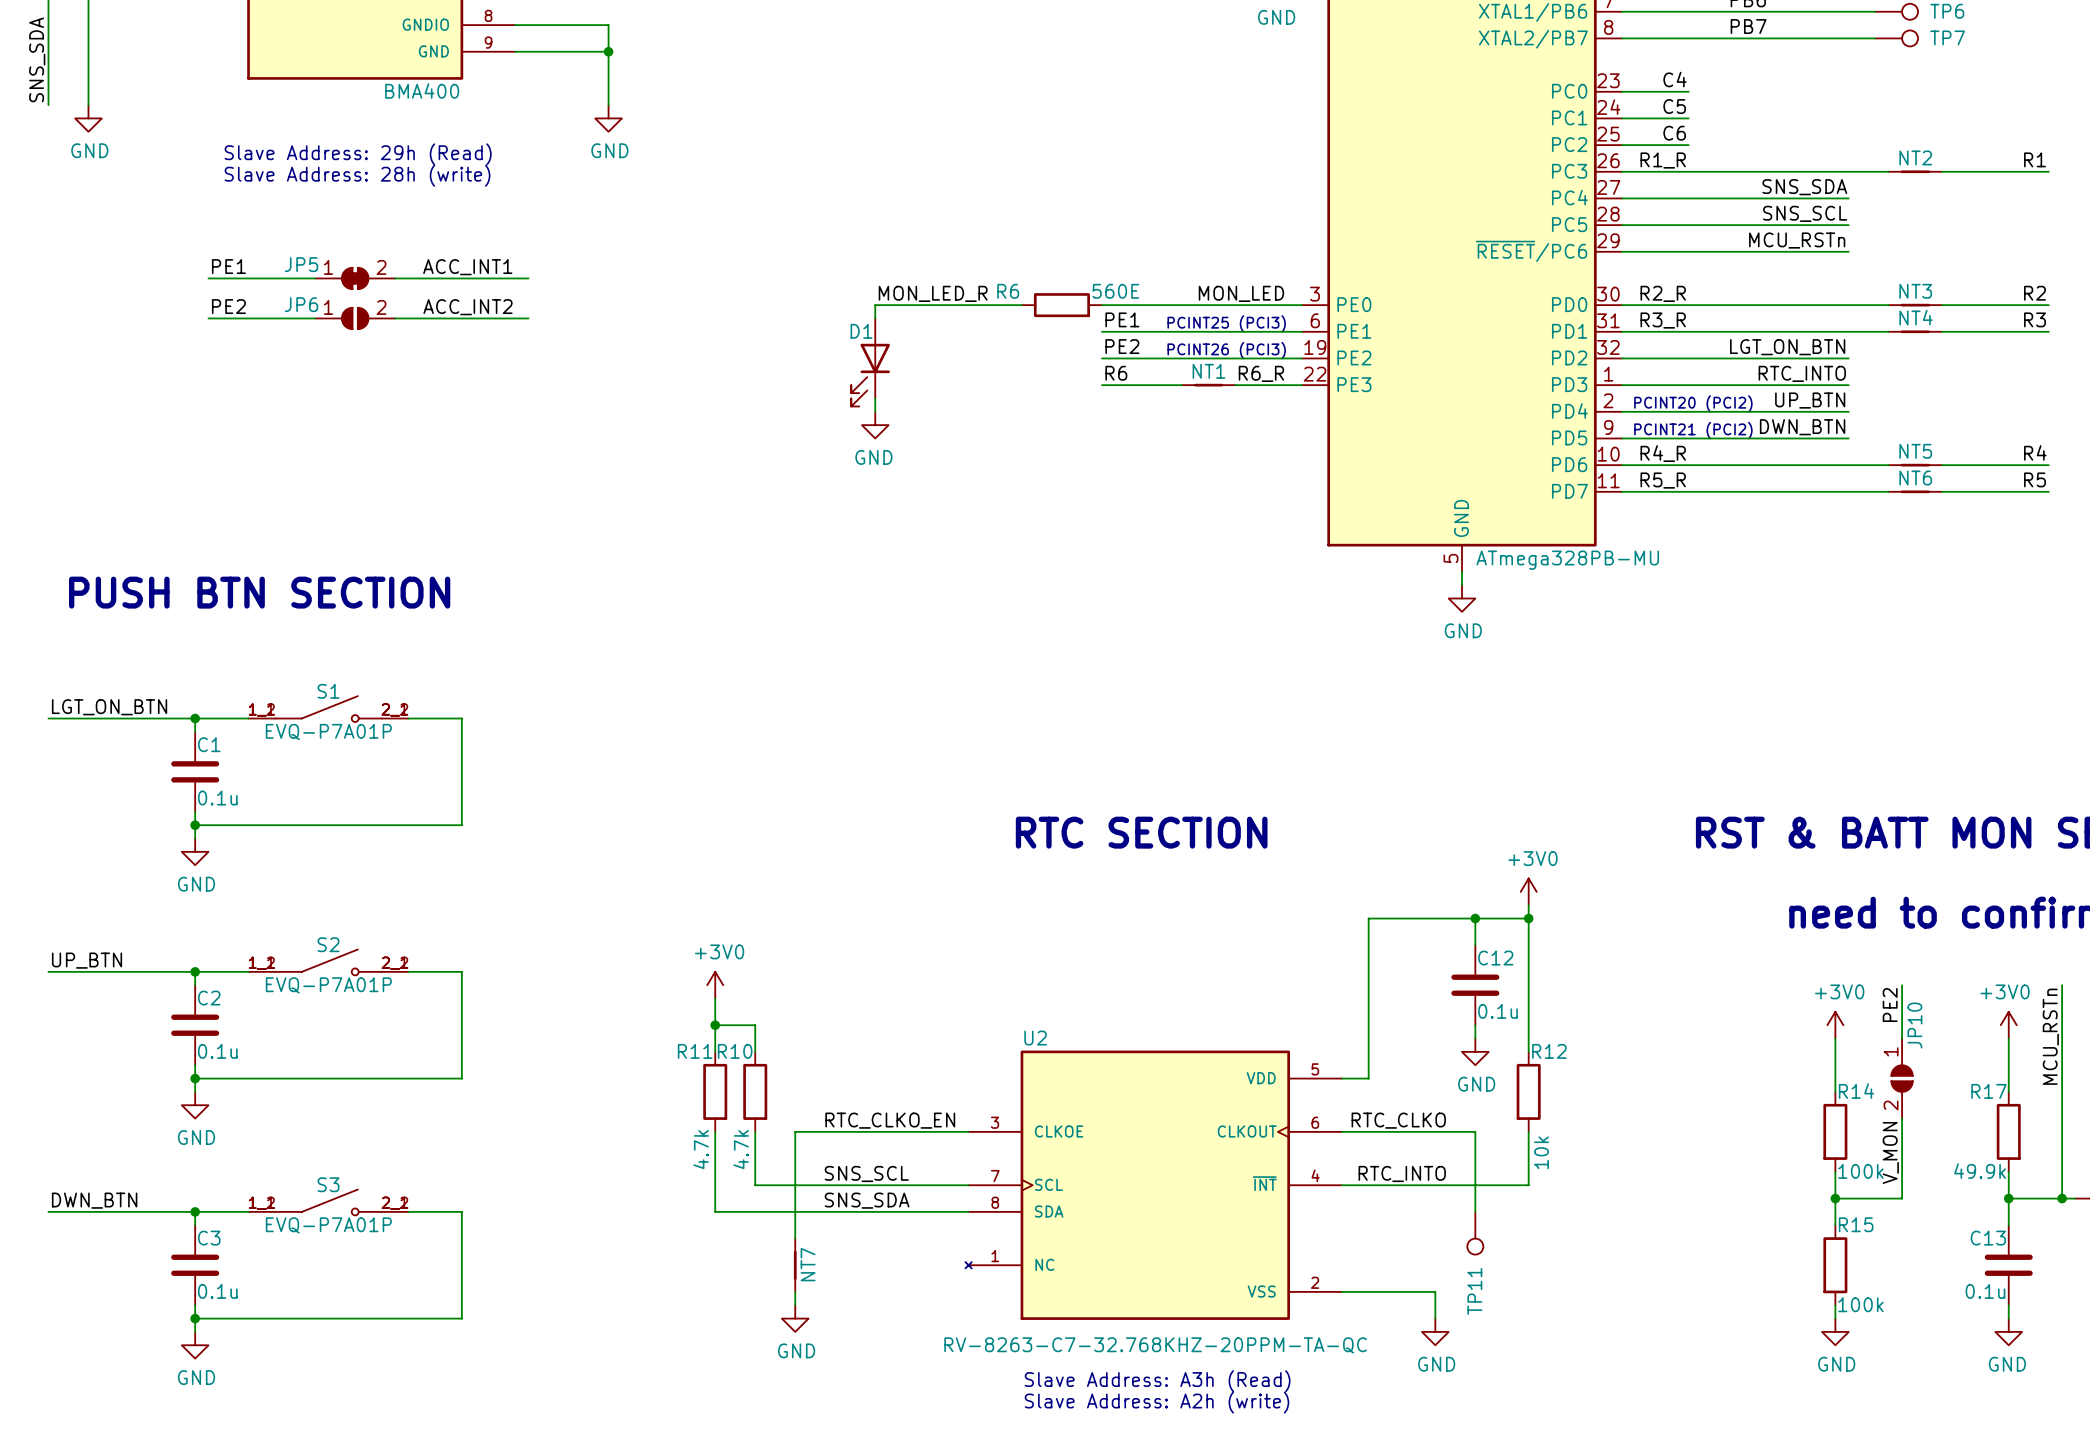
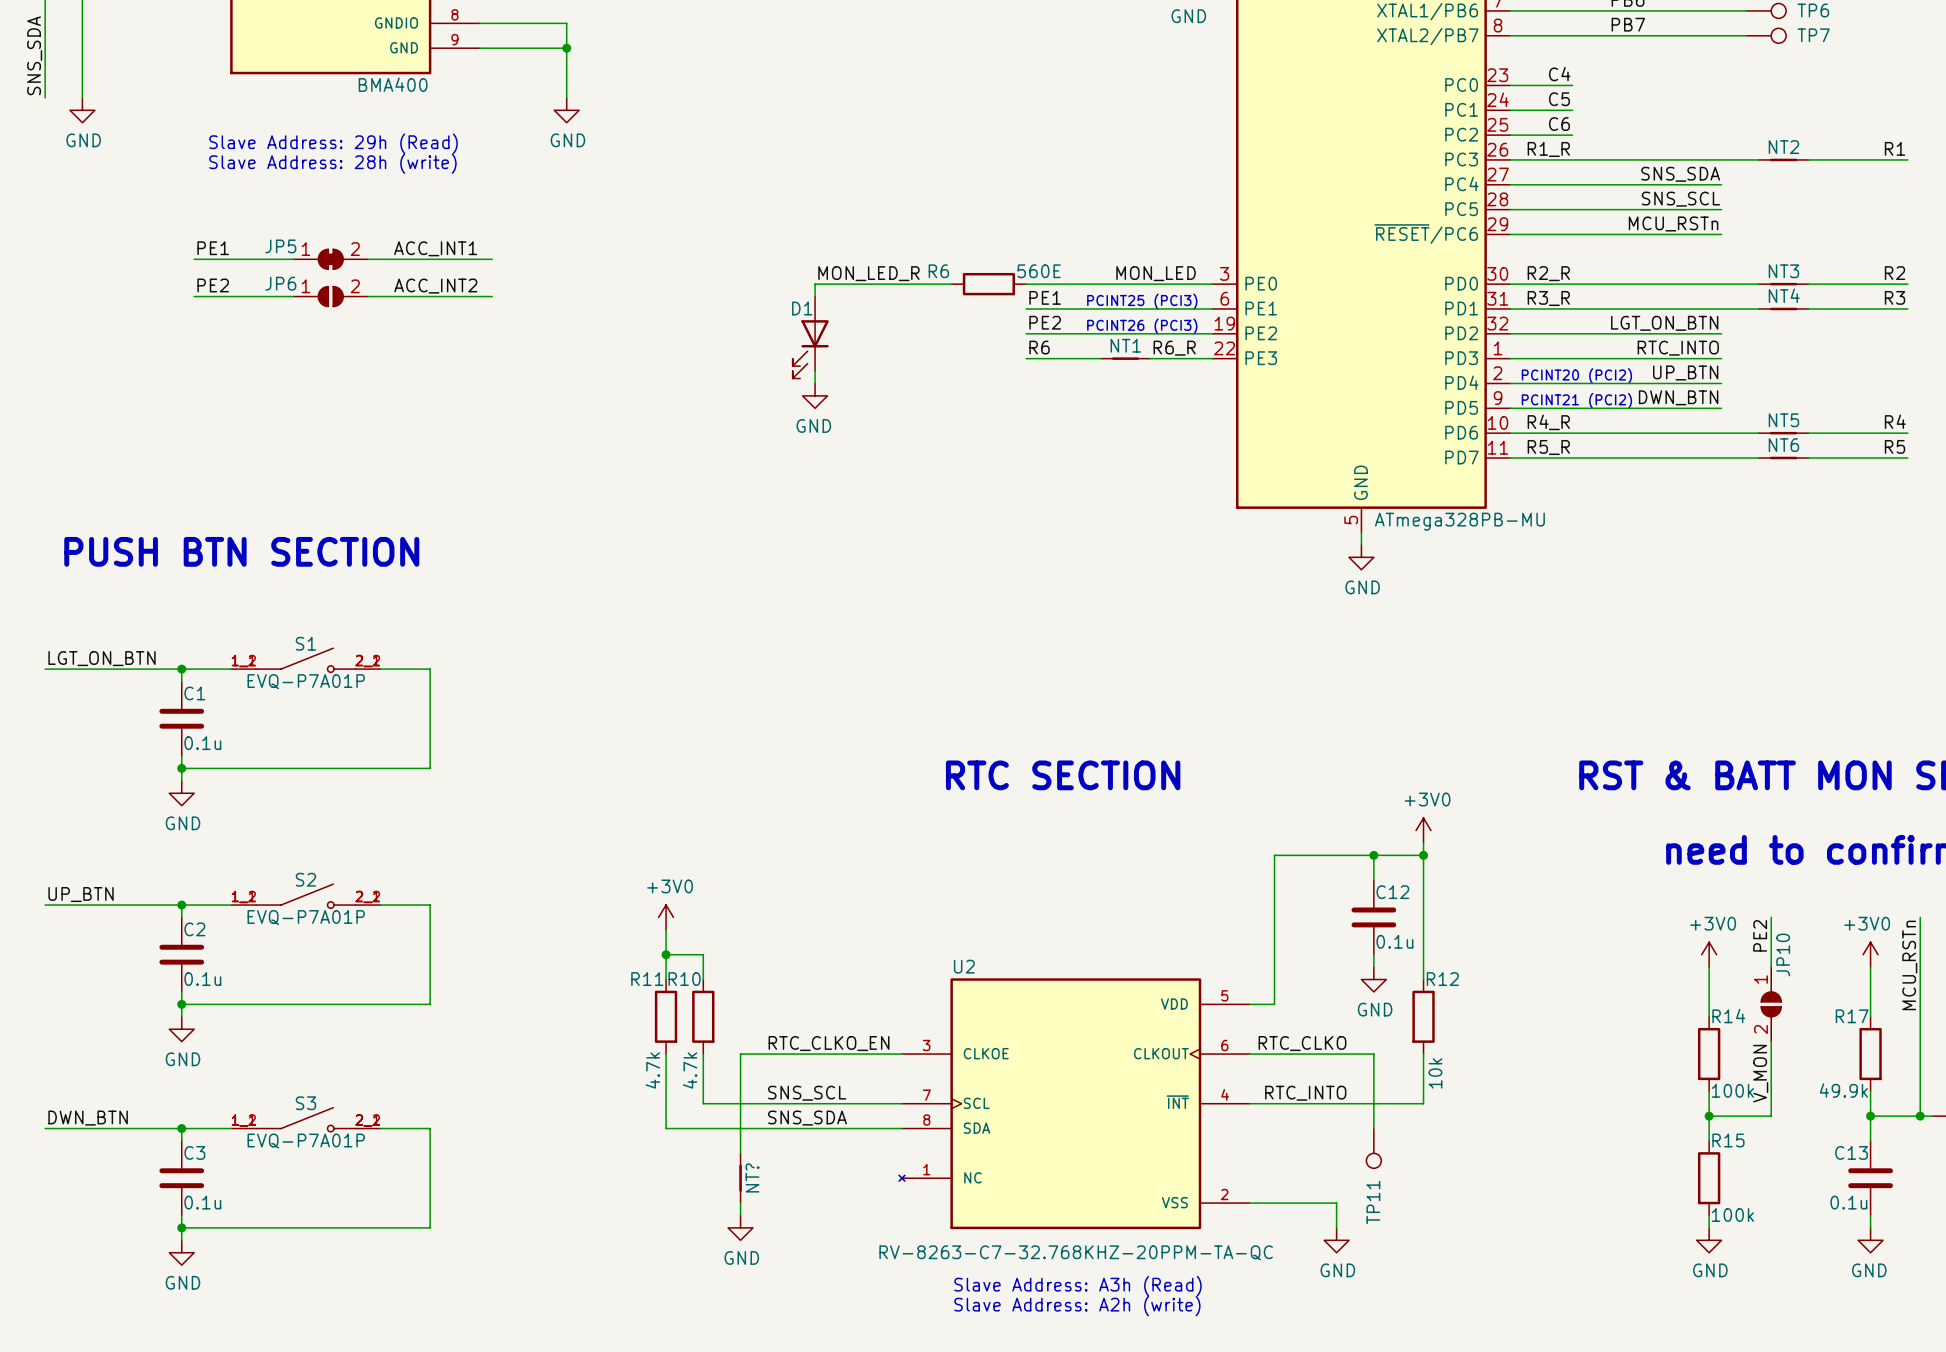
NT7 name: NT7 (808, 1264) -> NT? (752, 1177)

